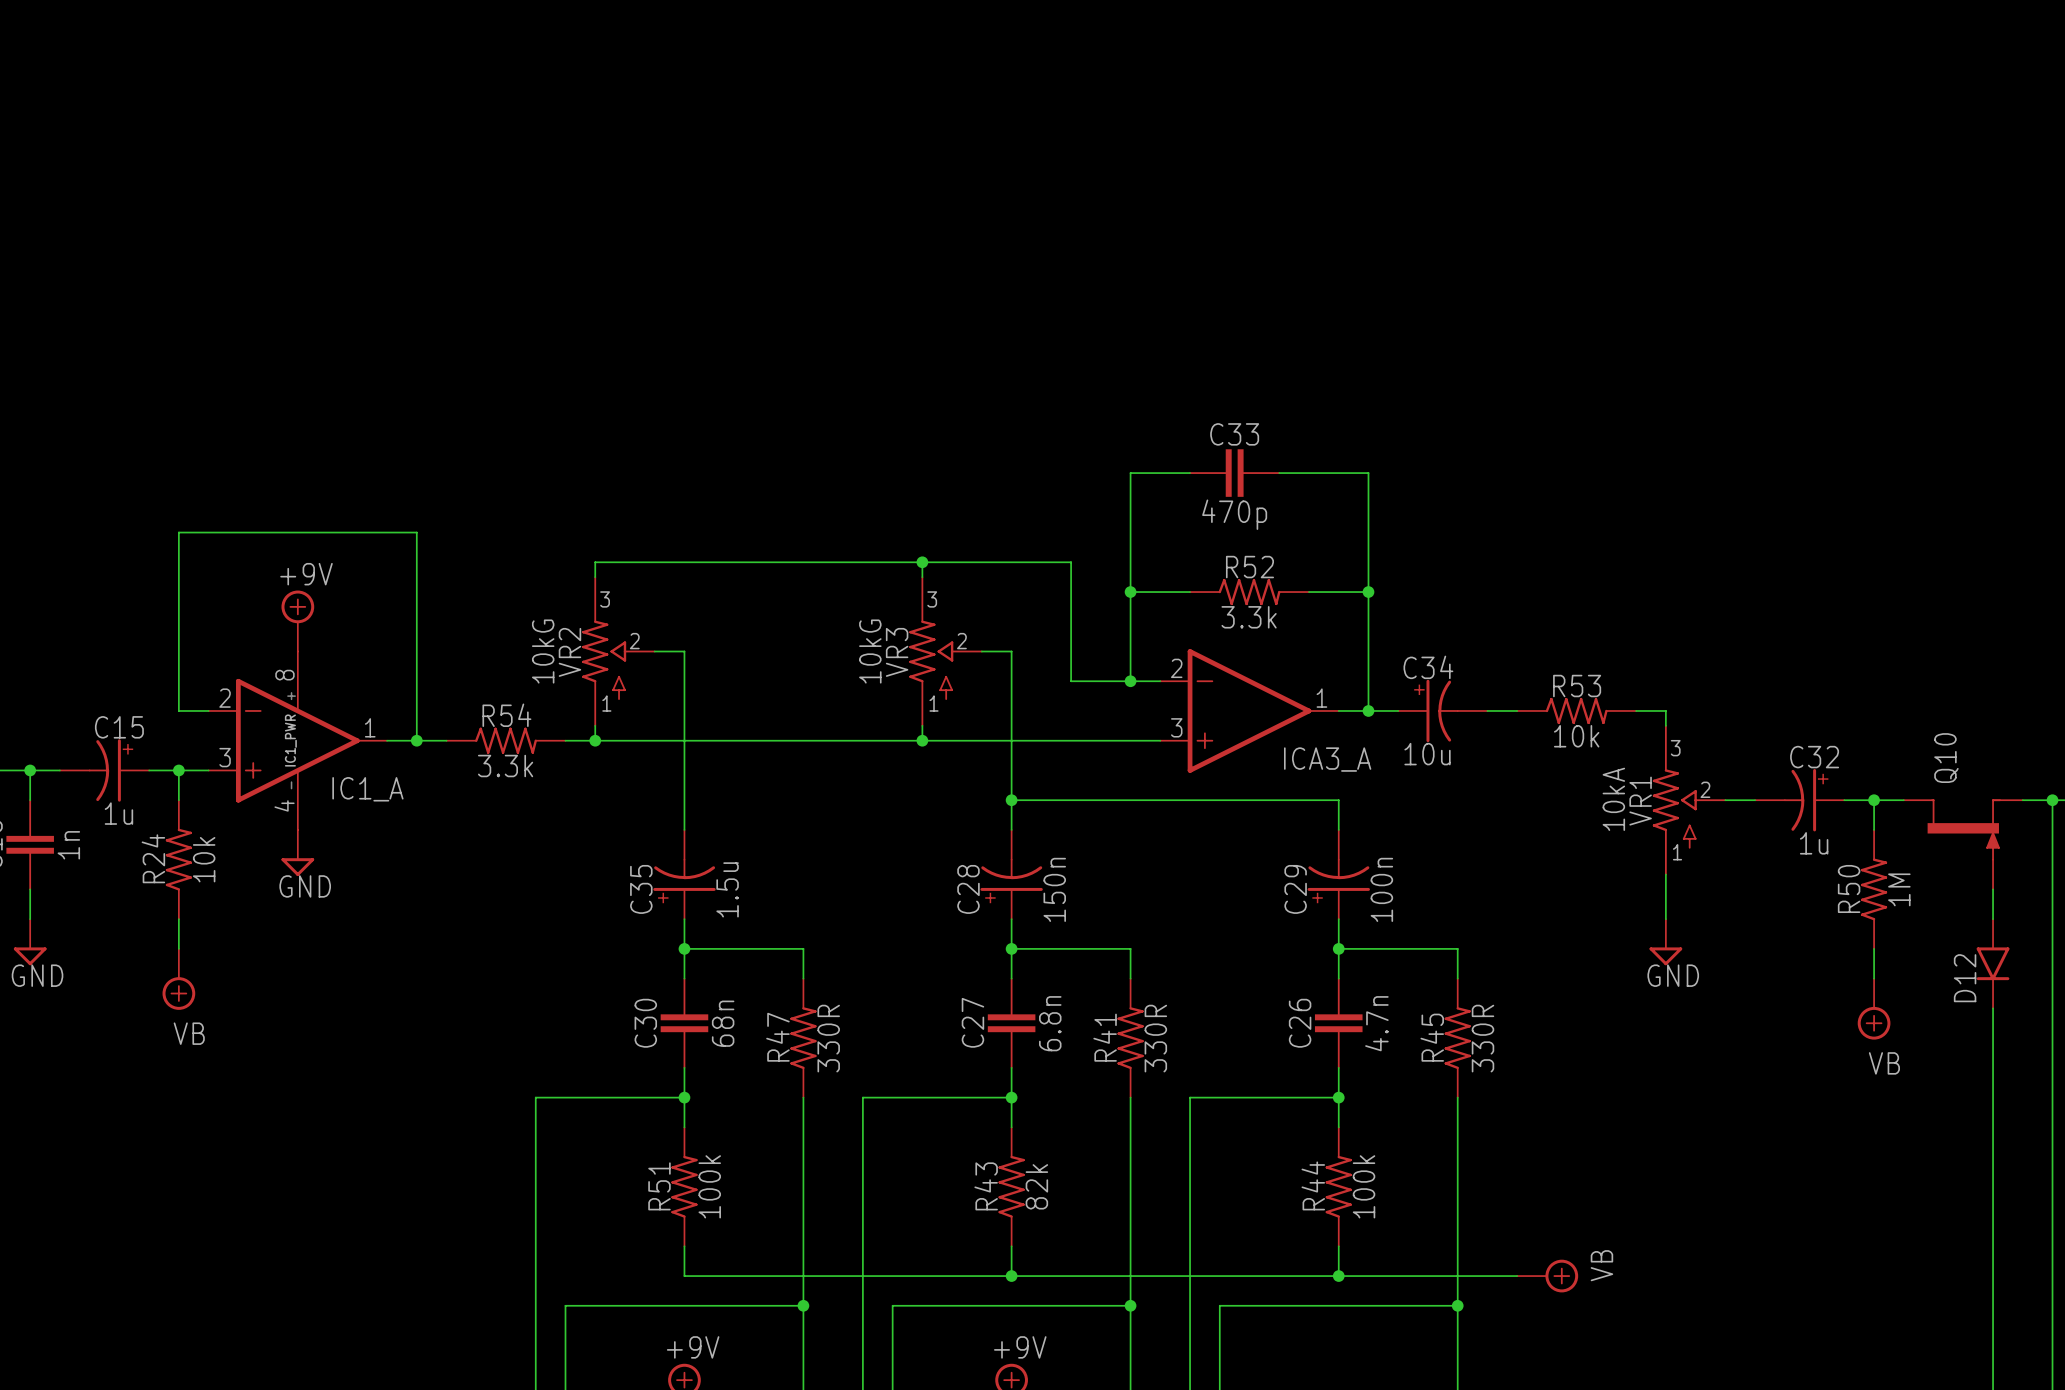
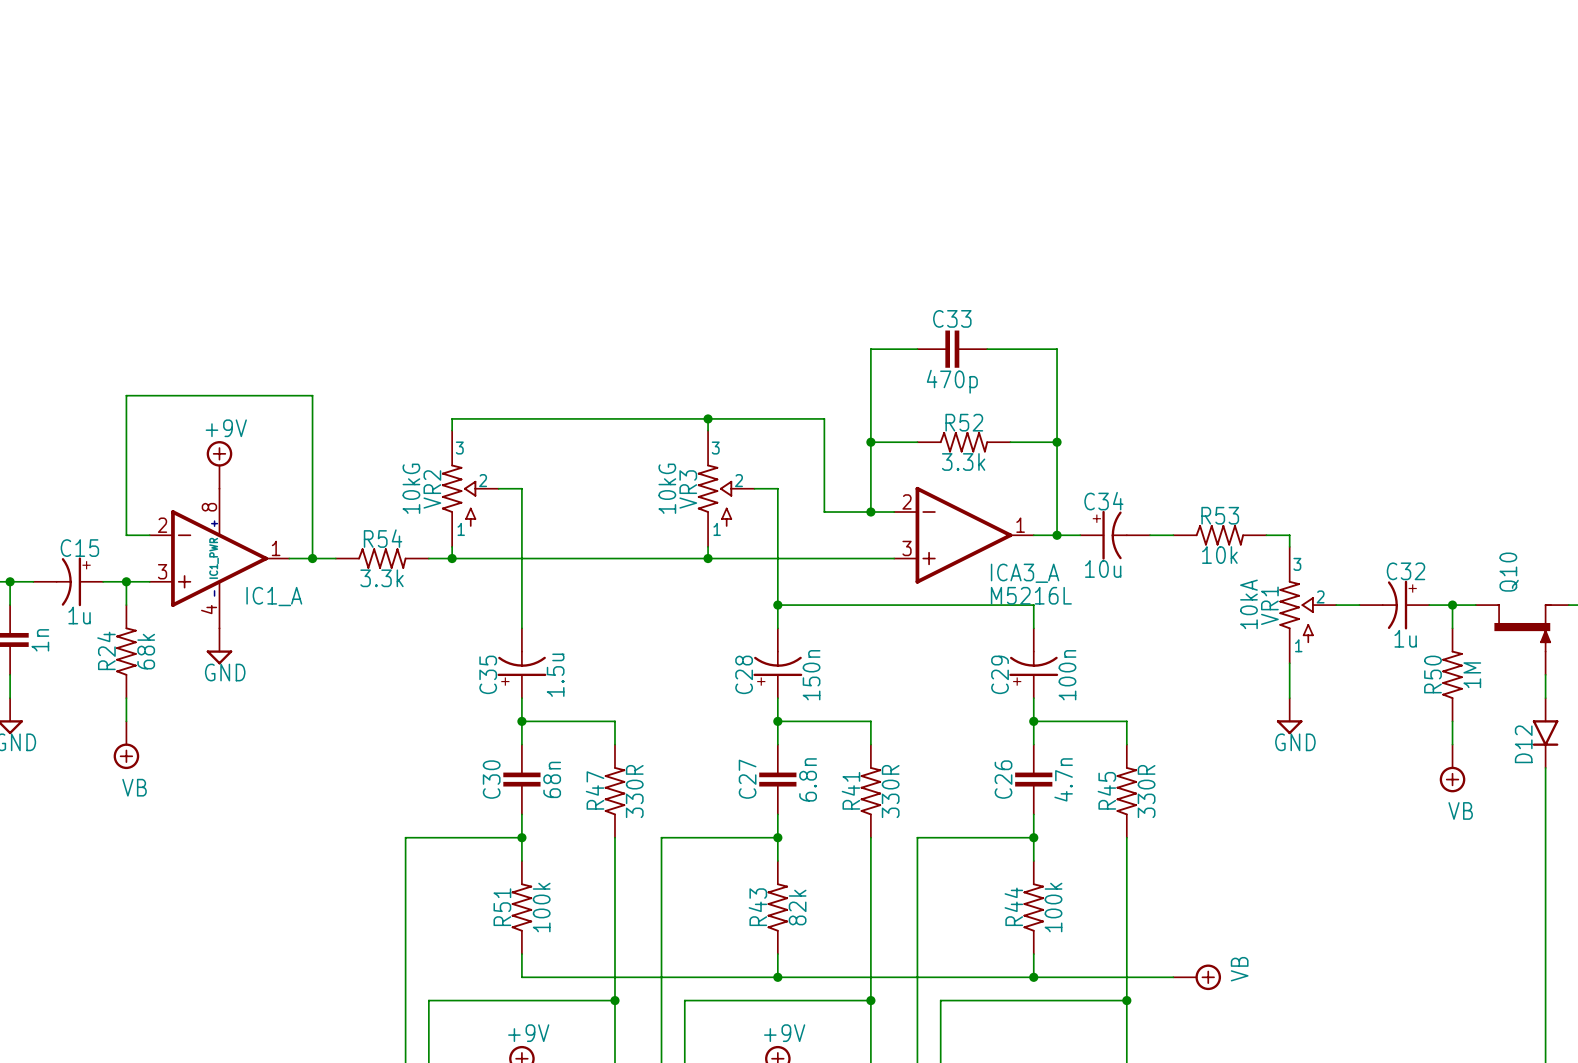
ICA3_A value: none -> M5216L (1031, 595)
R24 value: 10k (204, 859) -> 68k (146, 651)

